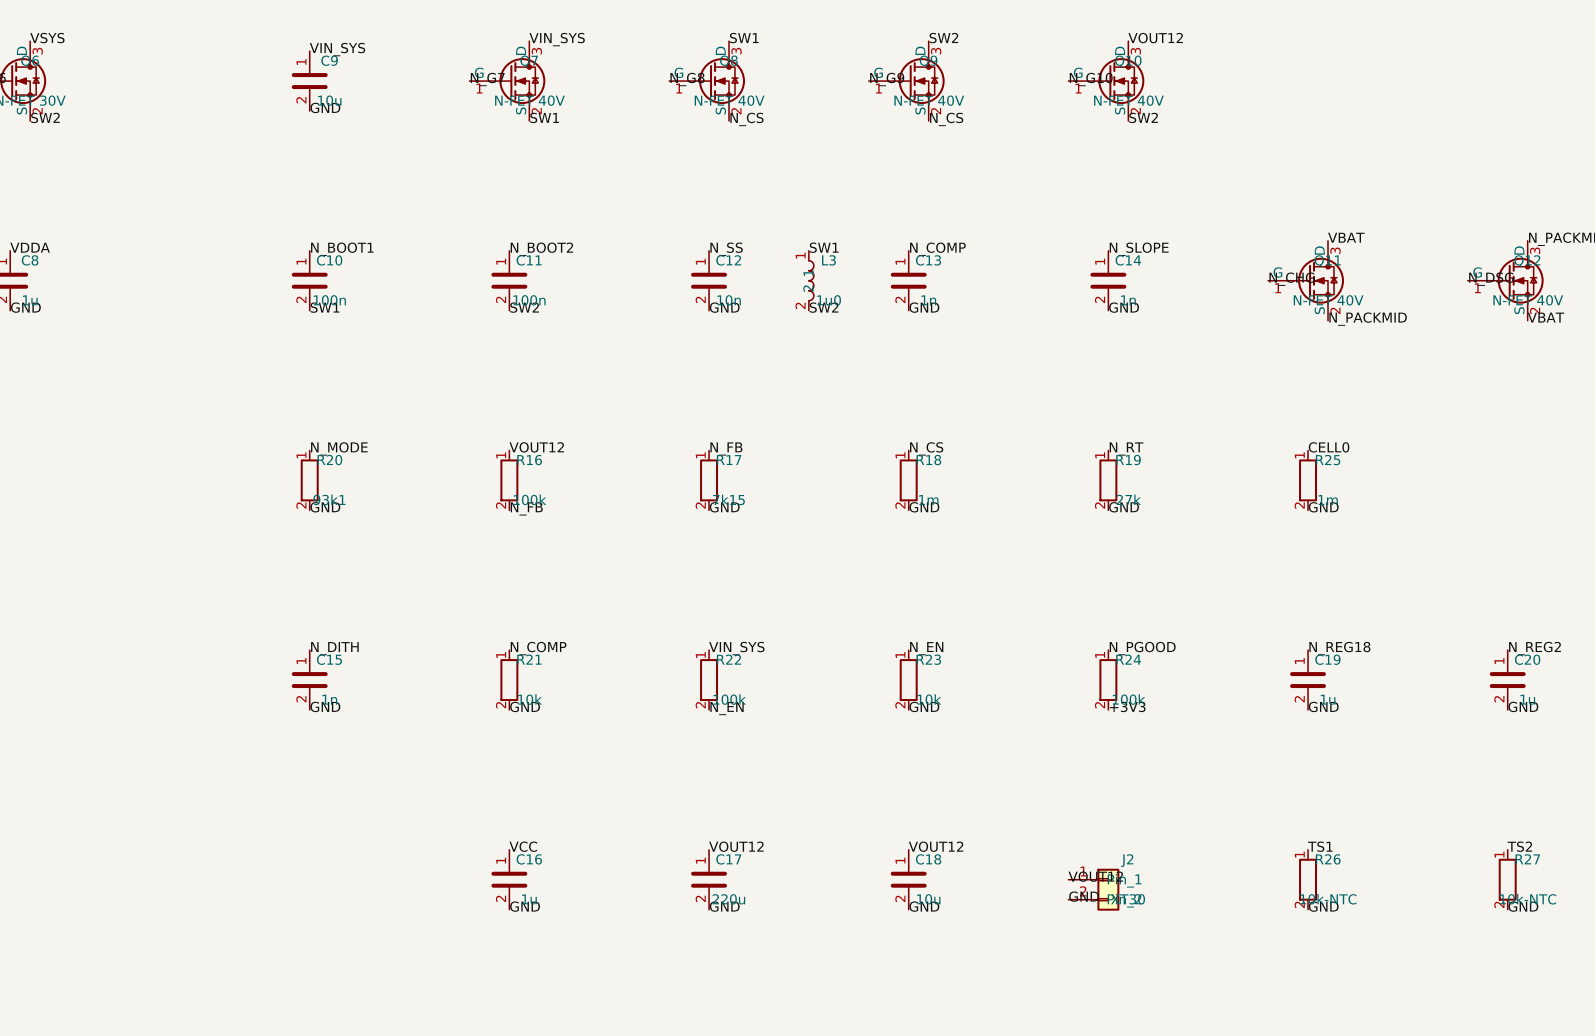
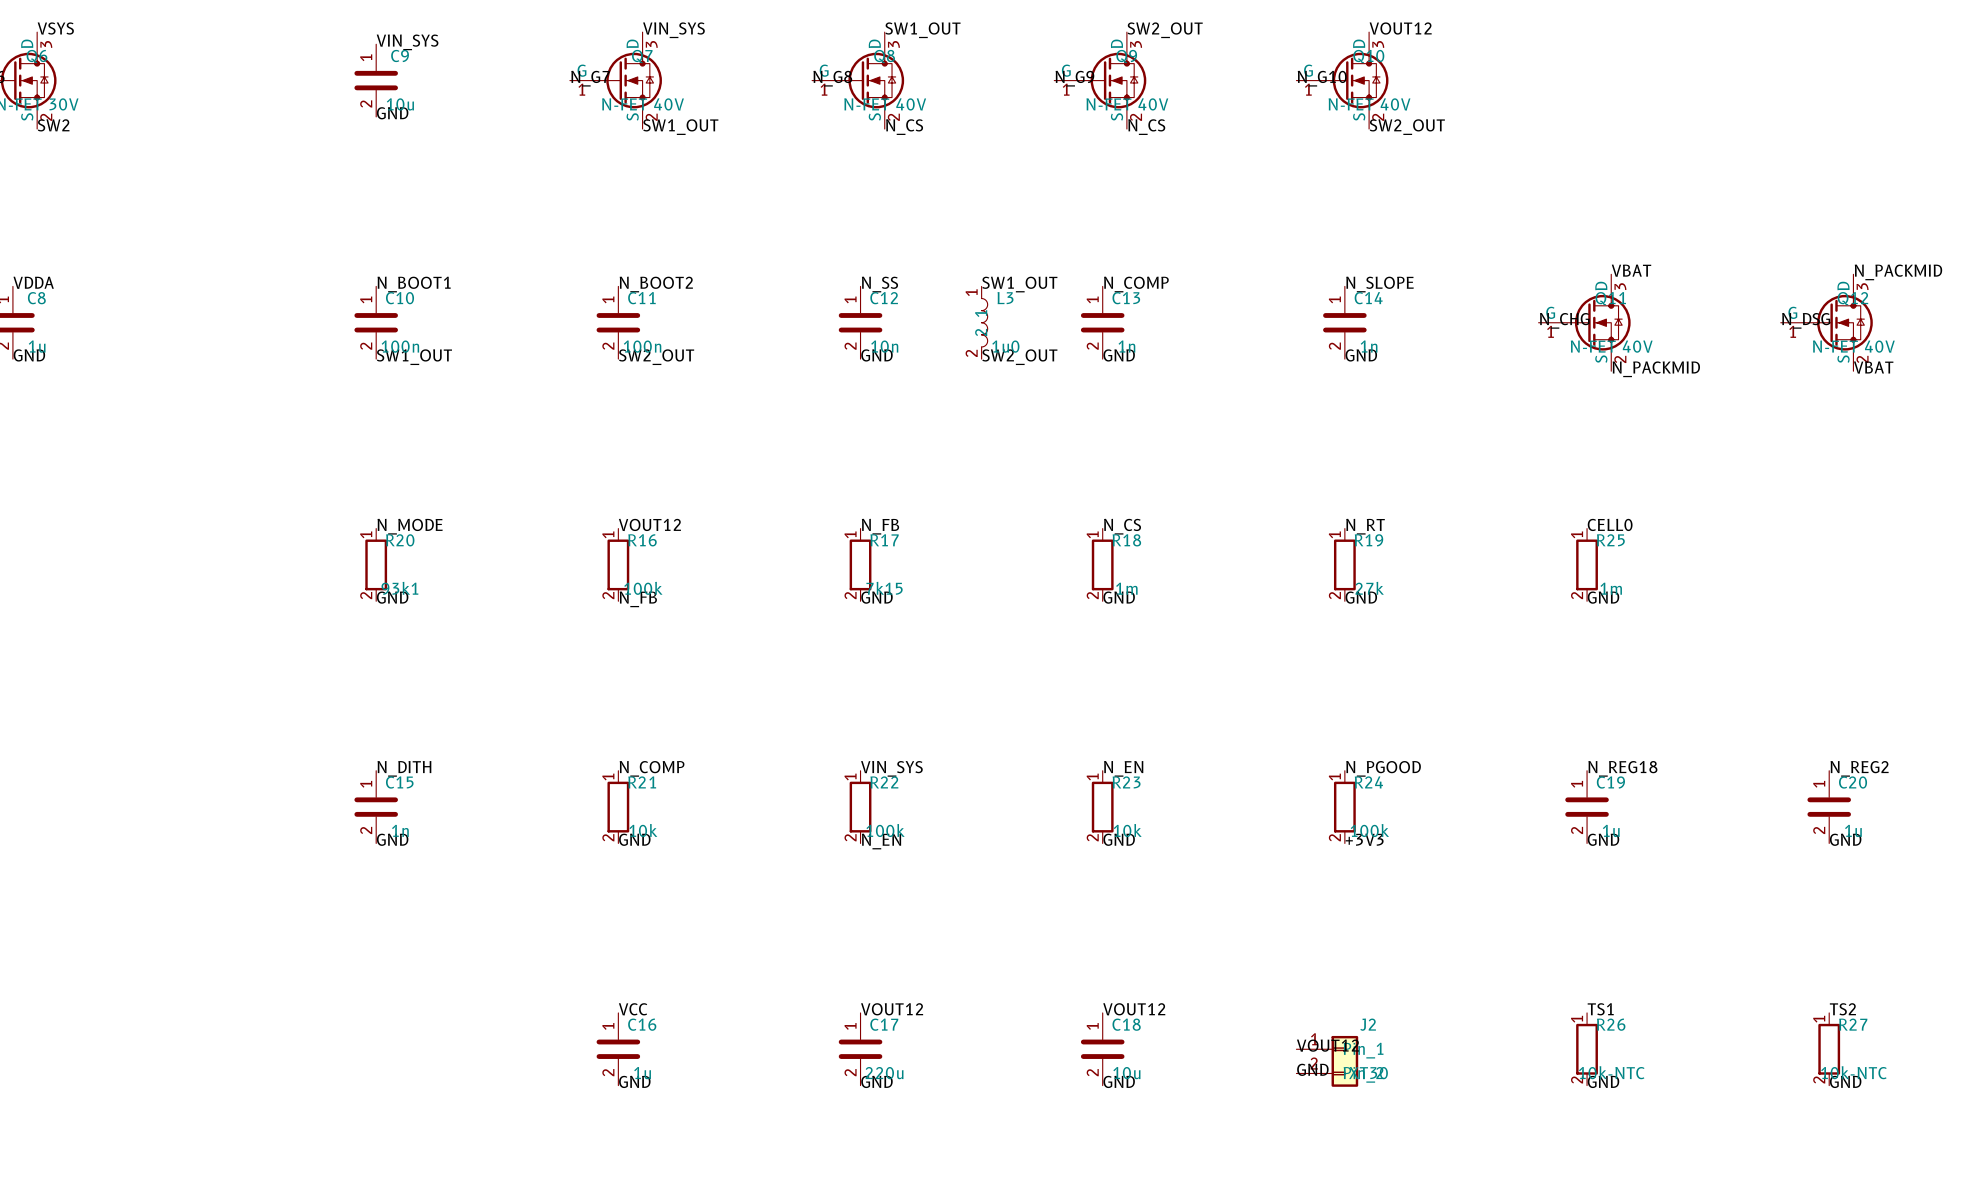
label: SW1 (744, 38) -> SW1_OUT (922, 30)
label: SW2 (943, 38) -> SW2_OUT (1165, 30)
label: SW1 (544, 117) -> SW1_OUT (680, 127)
label: SW2 (1143, 117) -> SW2_OUT (1407, 127)
label: SW1 (824, 247) -> SW1_OUT (1019, 284)
label: SW1 (325, 307) -> SW1_OUT (414, 357)
label: SW2 (524, 307) -> SW2_OUT (656, 357)
label: SW2 (824, 307) -> SW2_OUT (1019, 357)

